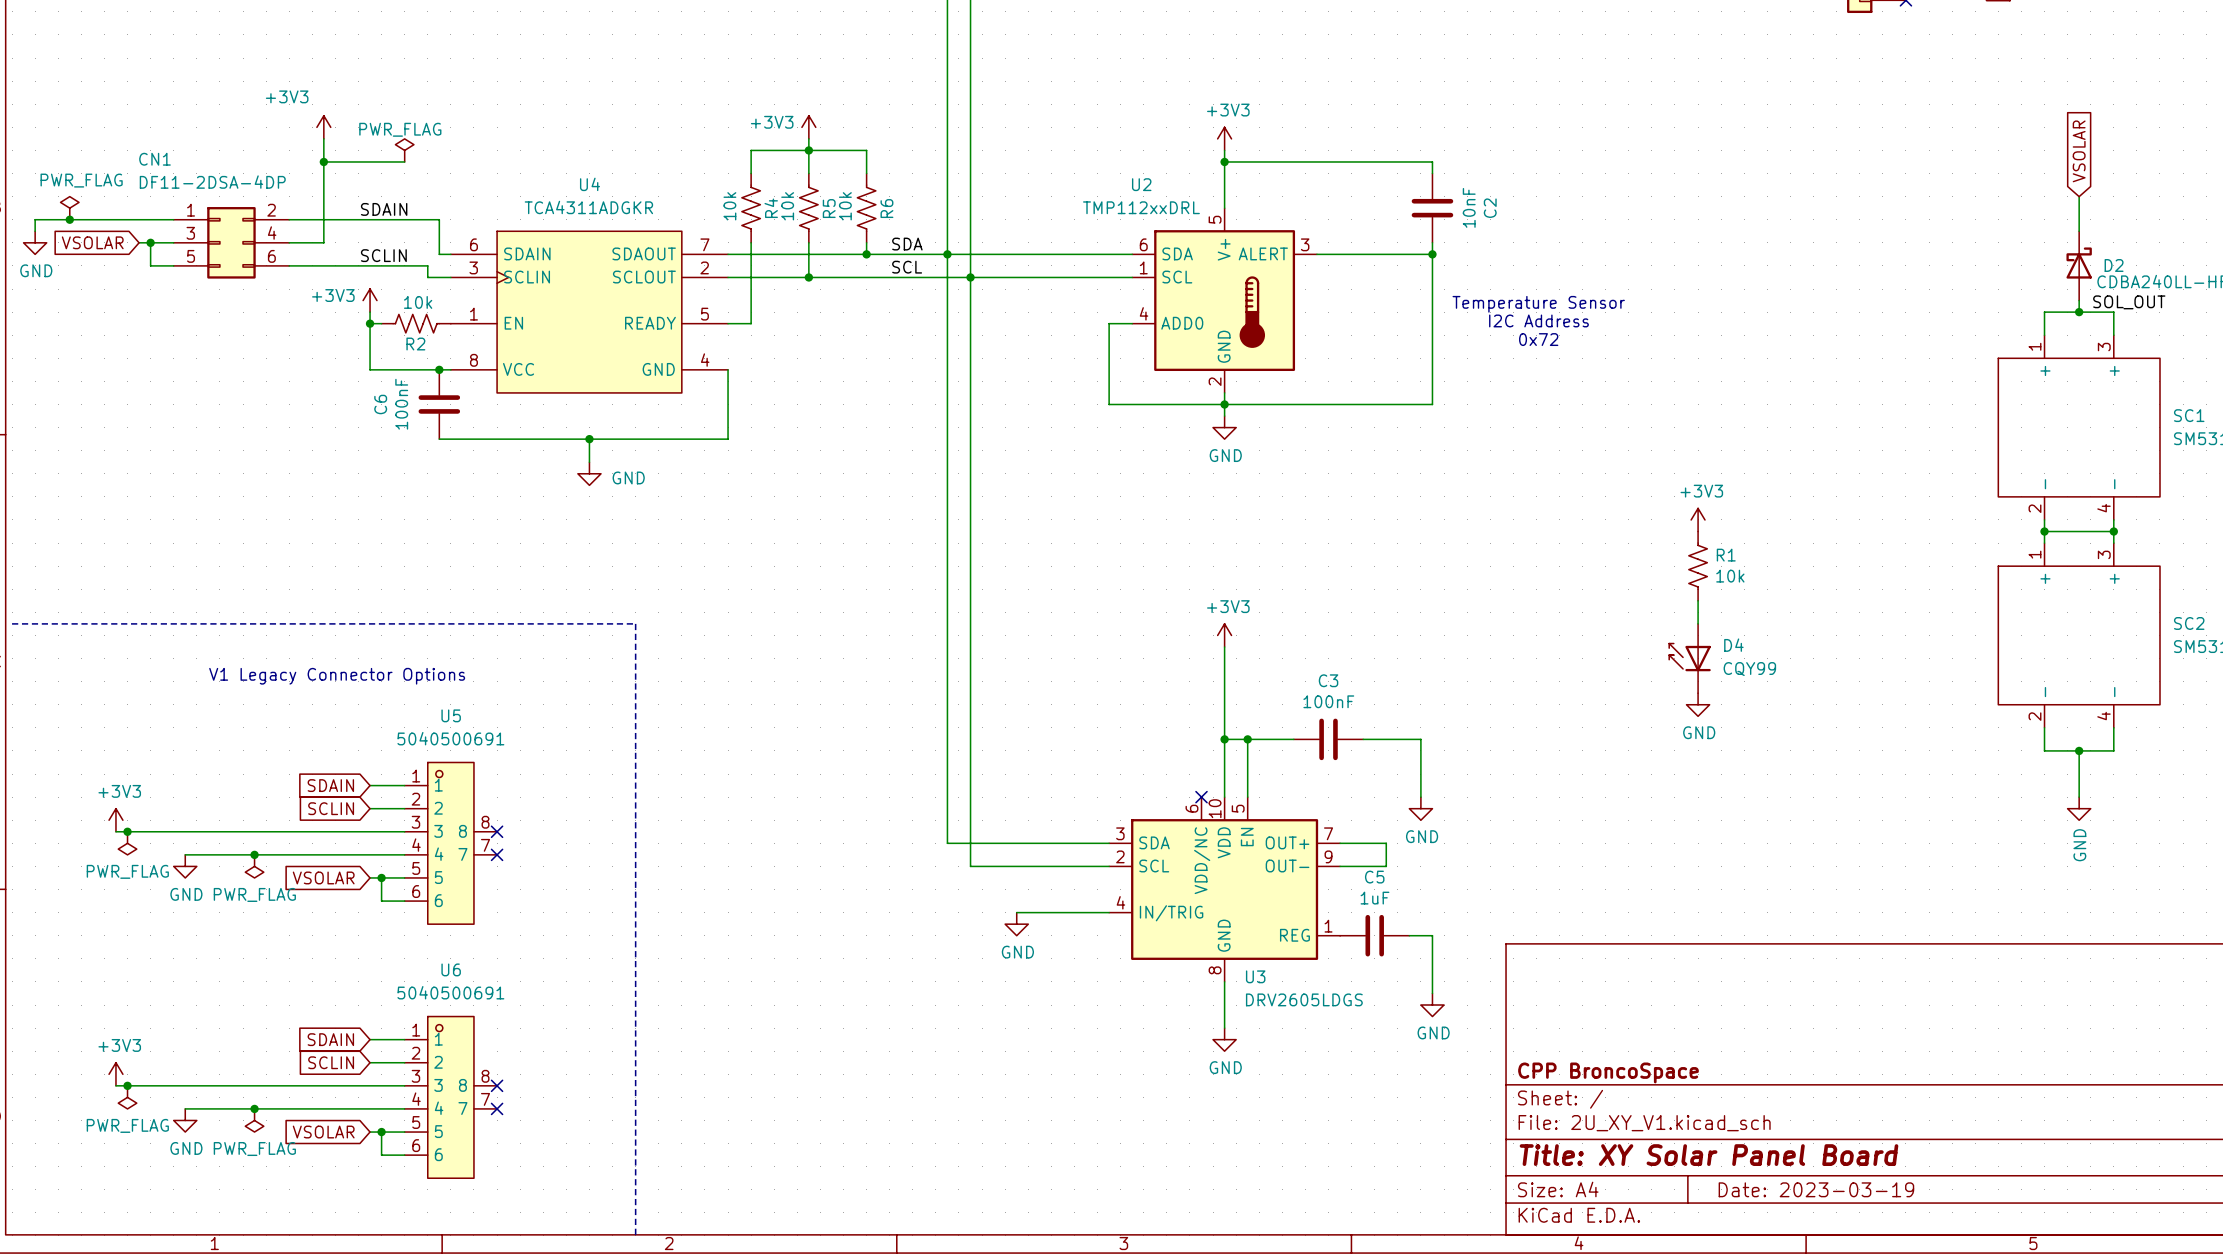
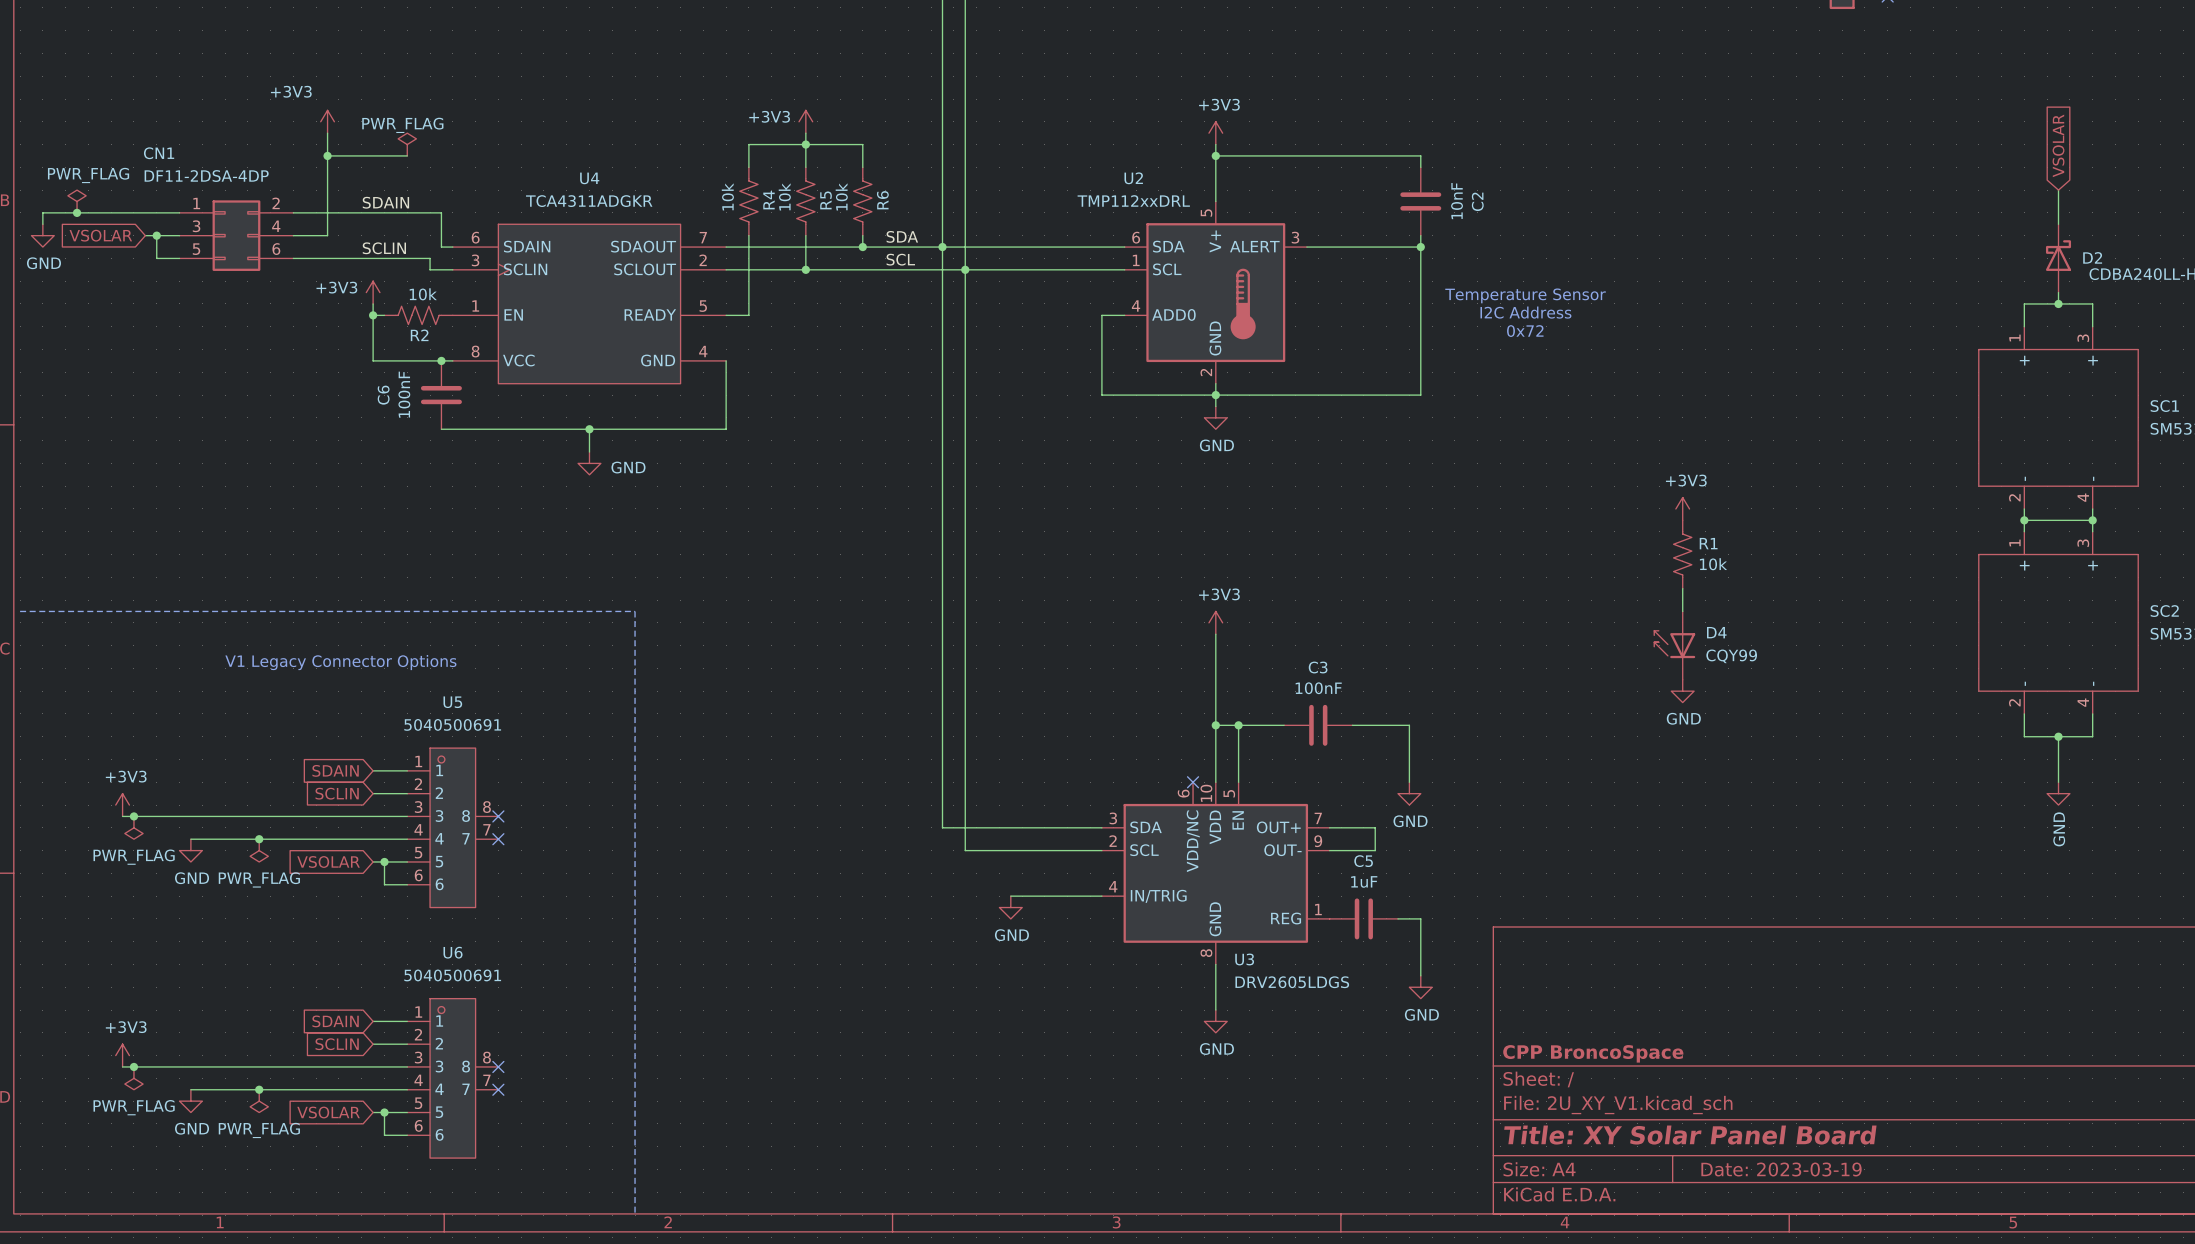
label: SOL_OUT (2129, 302) -> none

